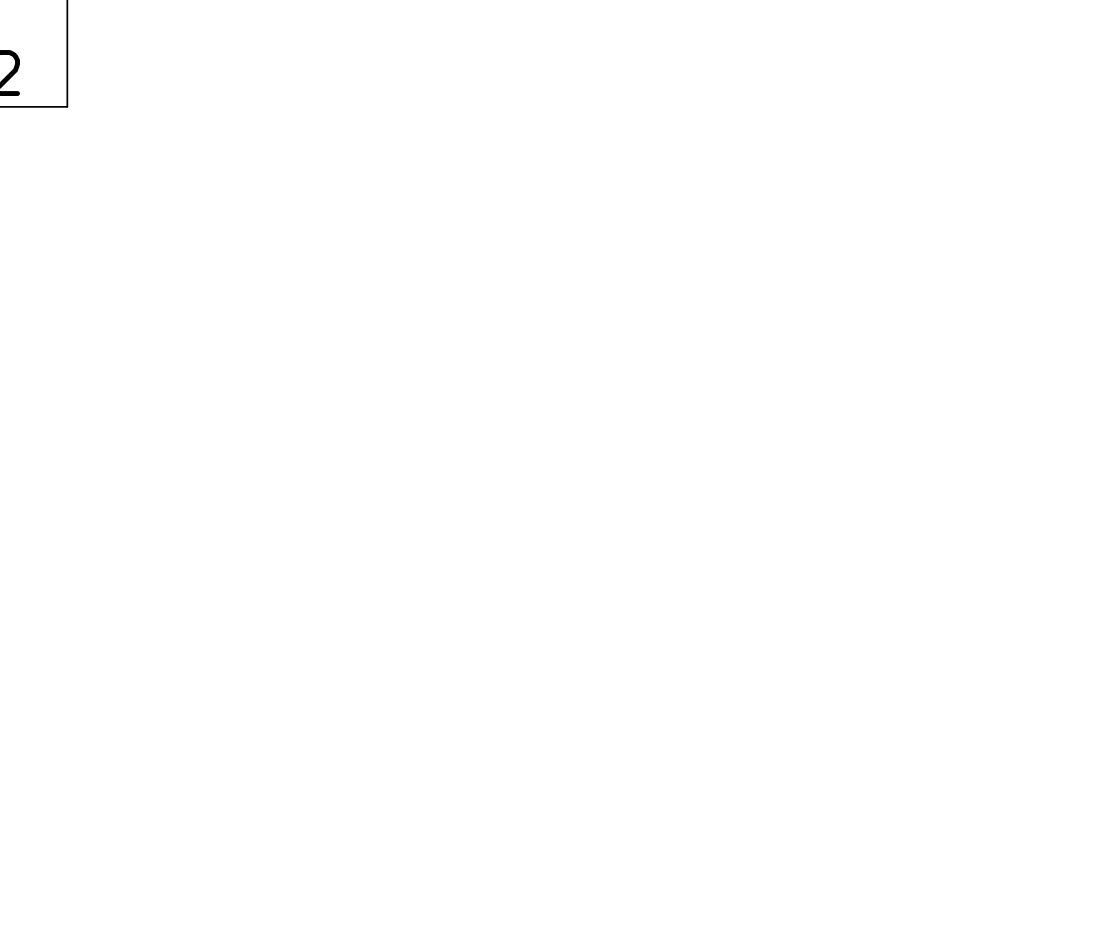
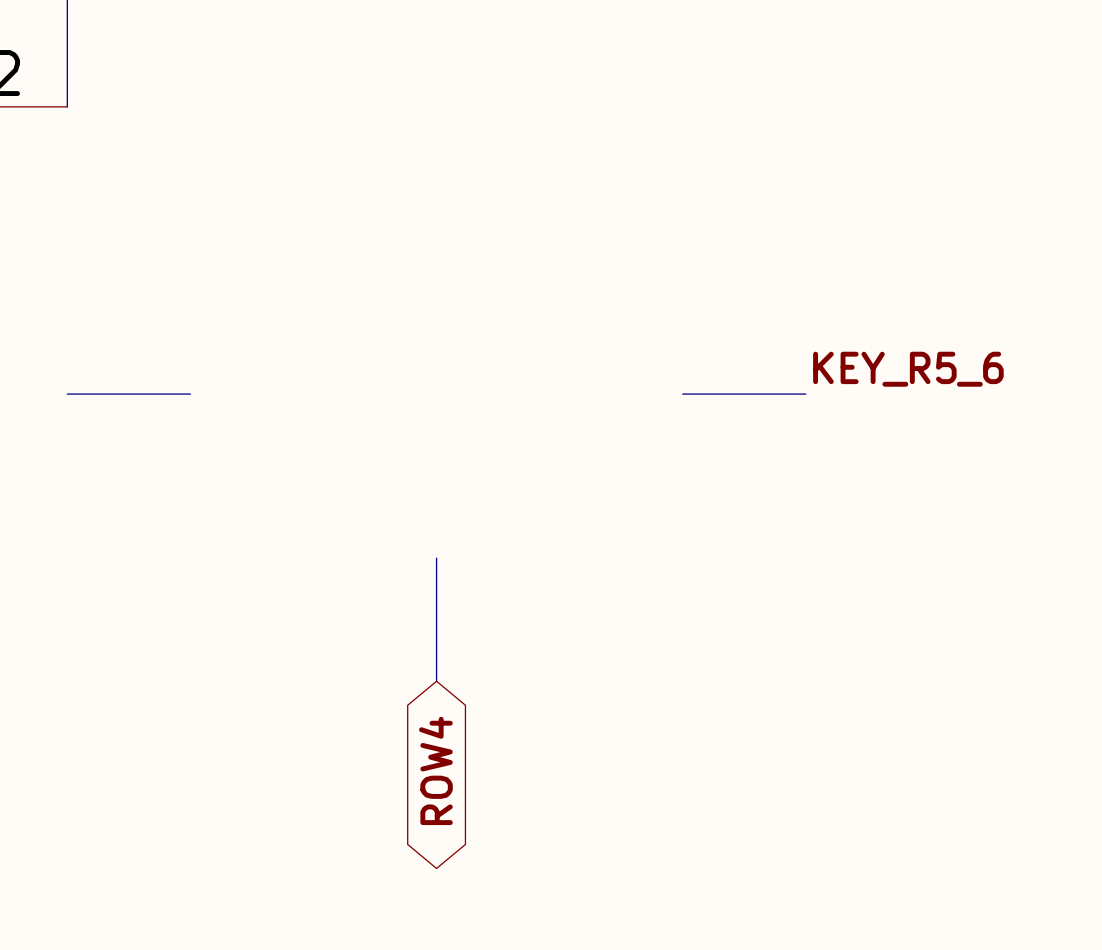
label: none -> KEY_R5_6 (908, 369)
wire: none -> (67, 394) (190, 394)
wire: none -> (682, 394) (805, 394)
wire: none -> (436, 558) (436, 681)
global label: none -> ROW4 (435, 770)

